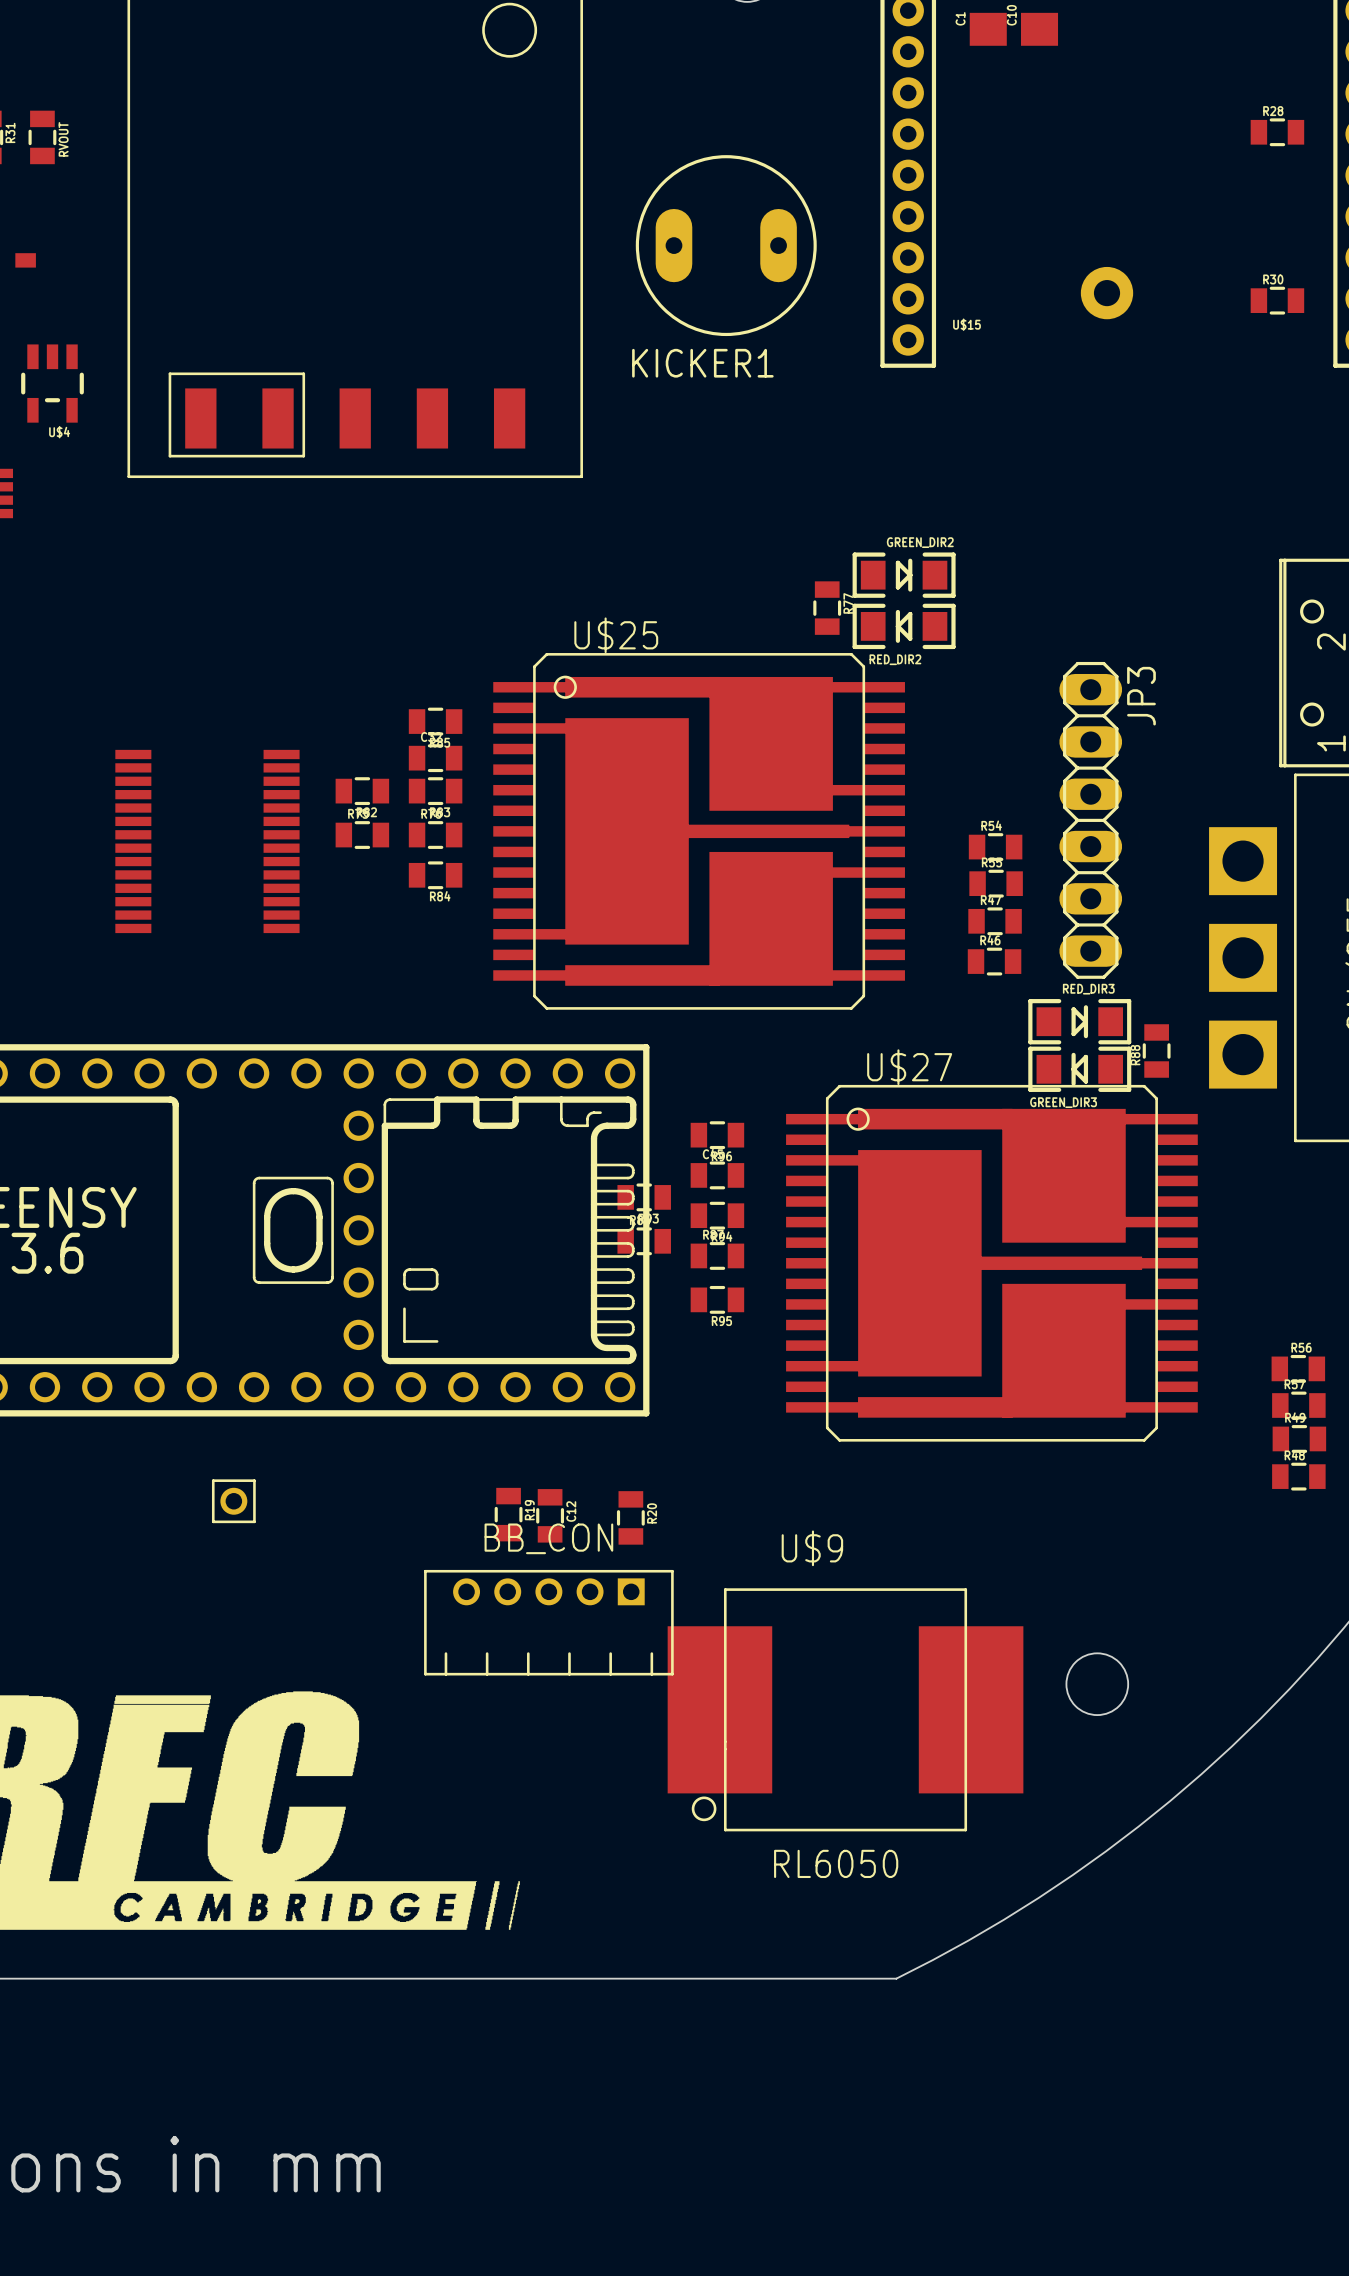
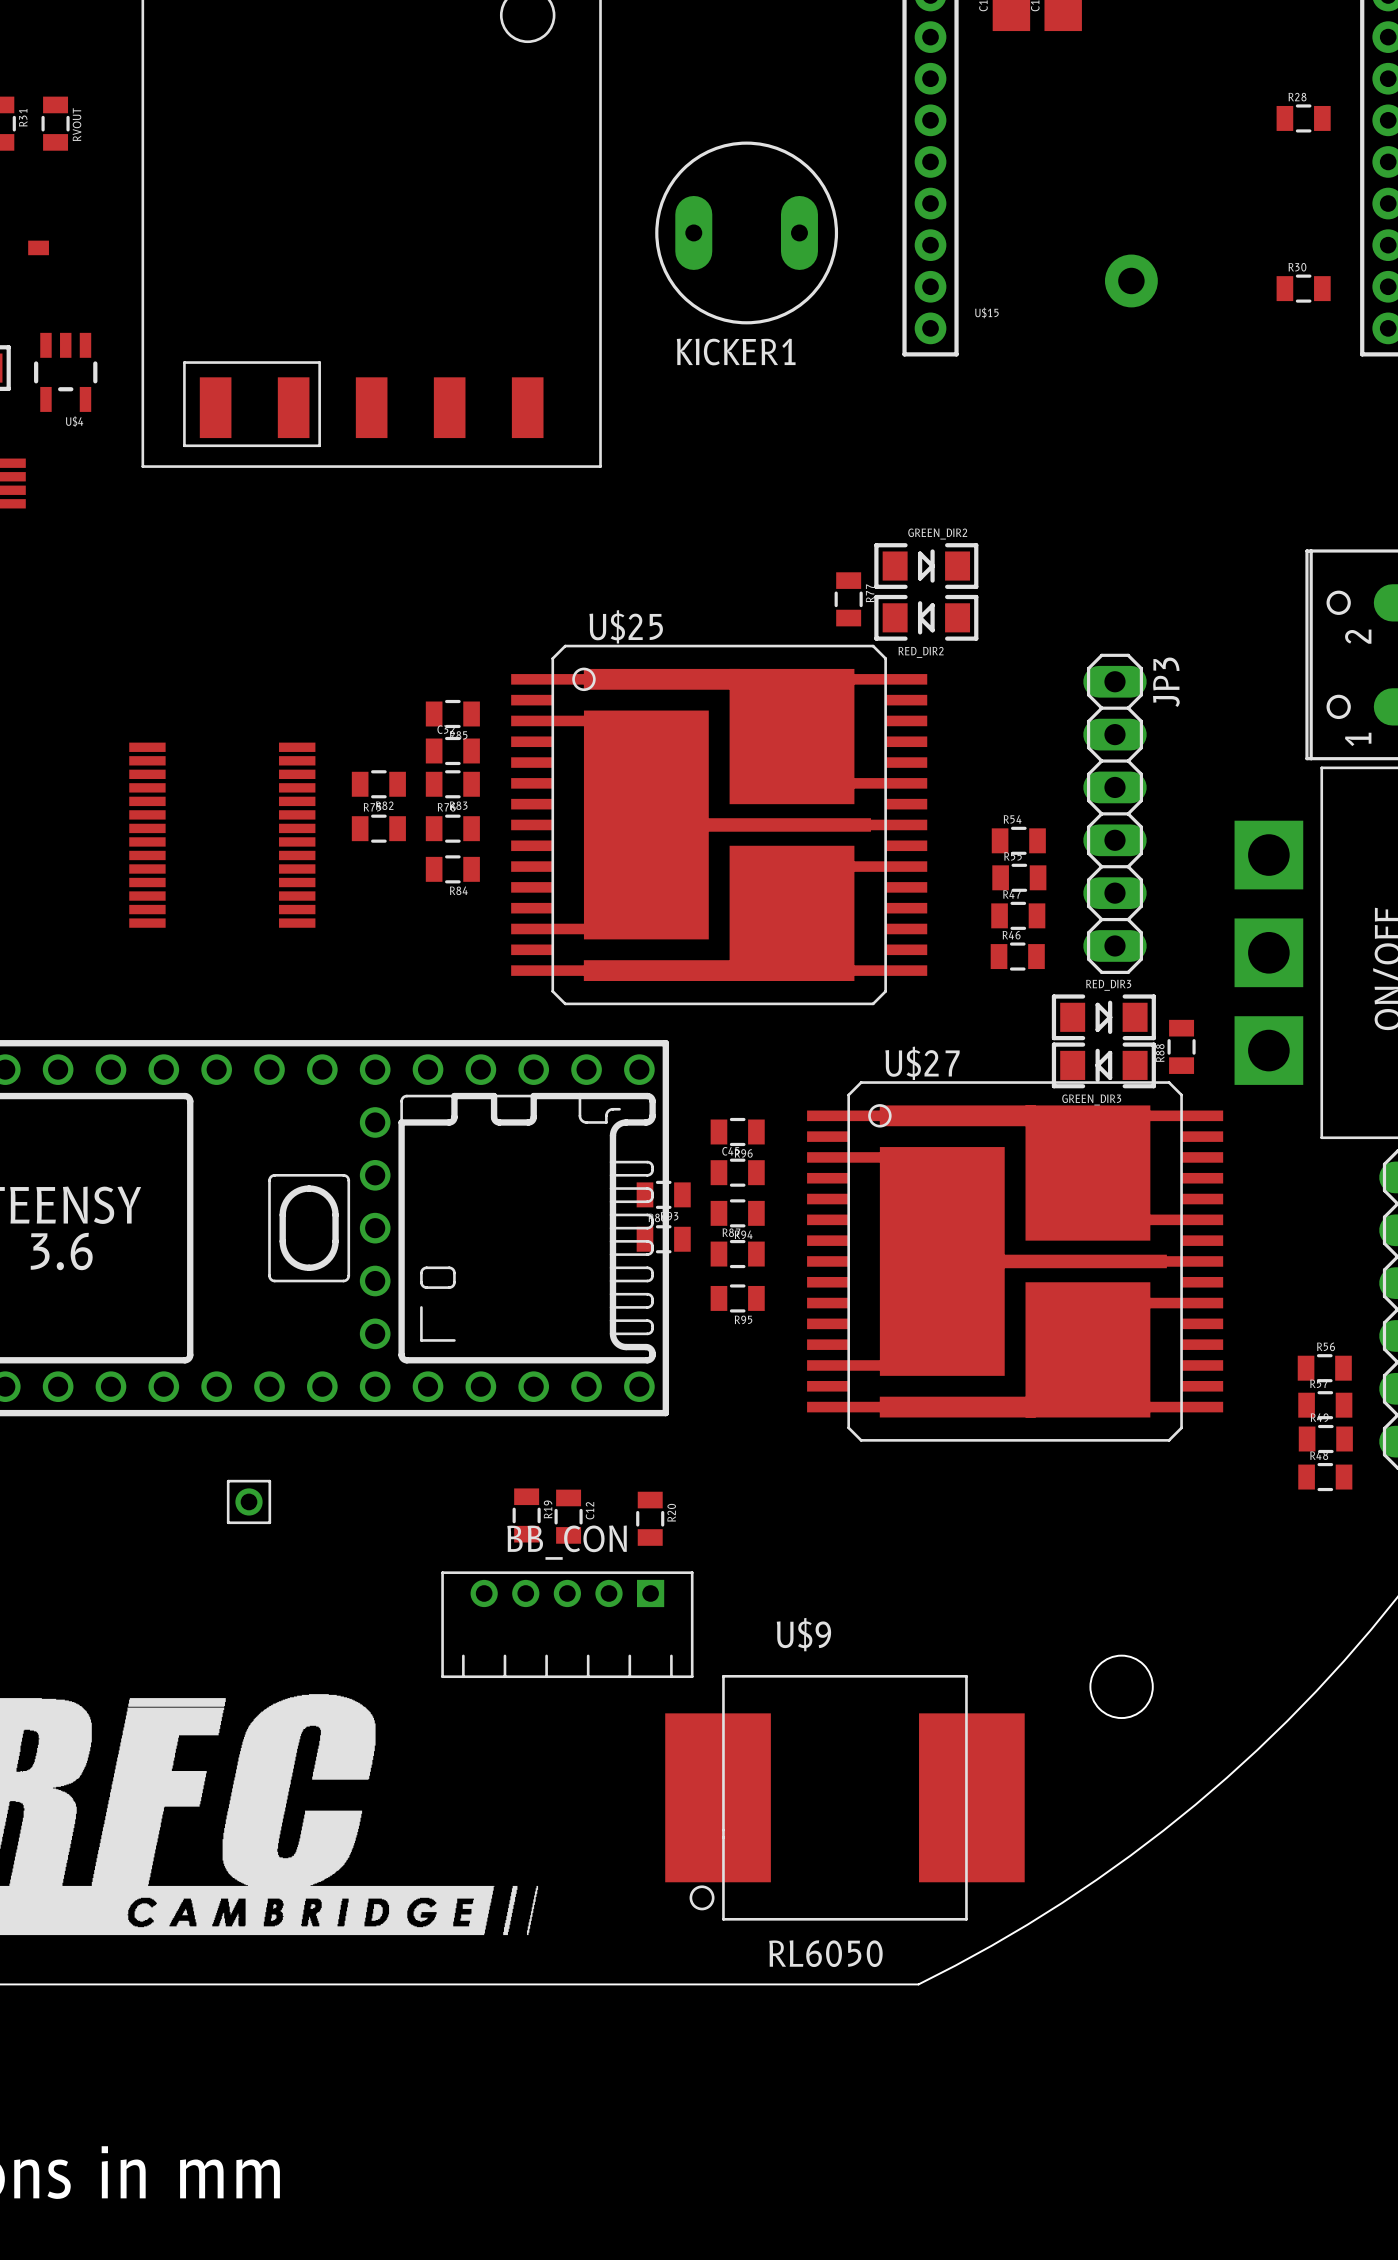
U$9 position: (845, 1709) -> (844, 1797)

